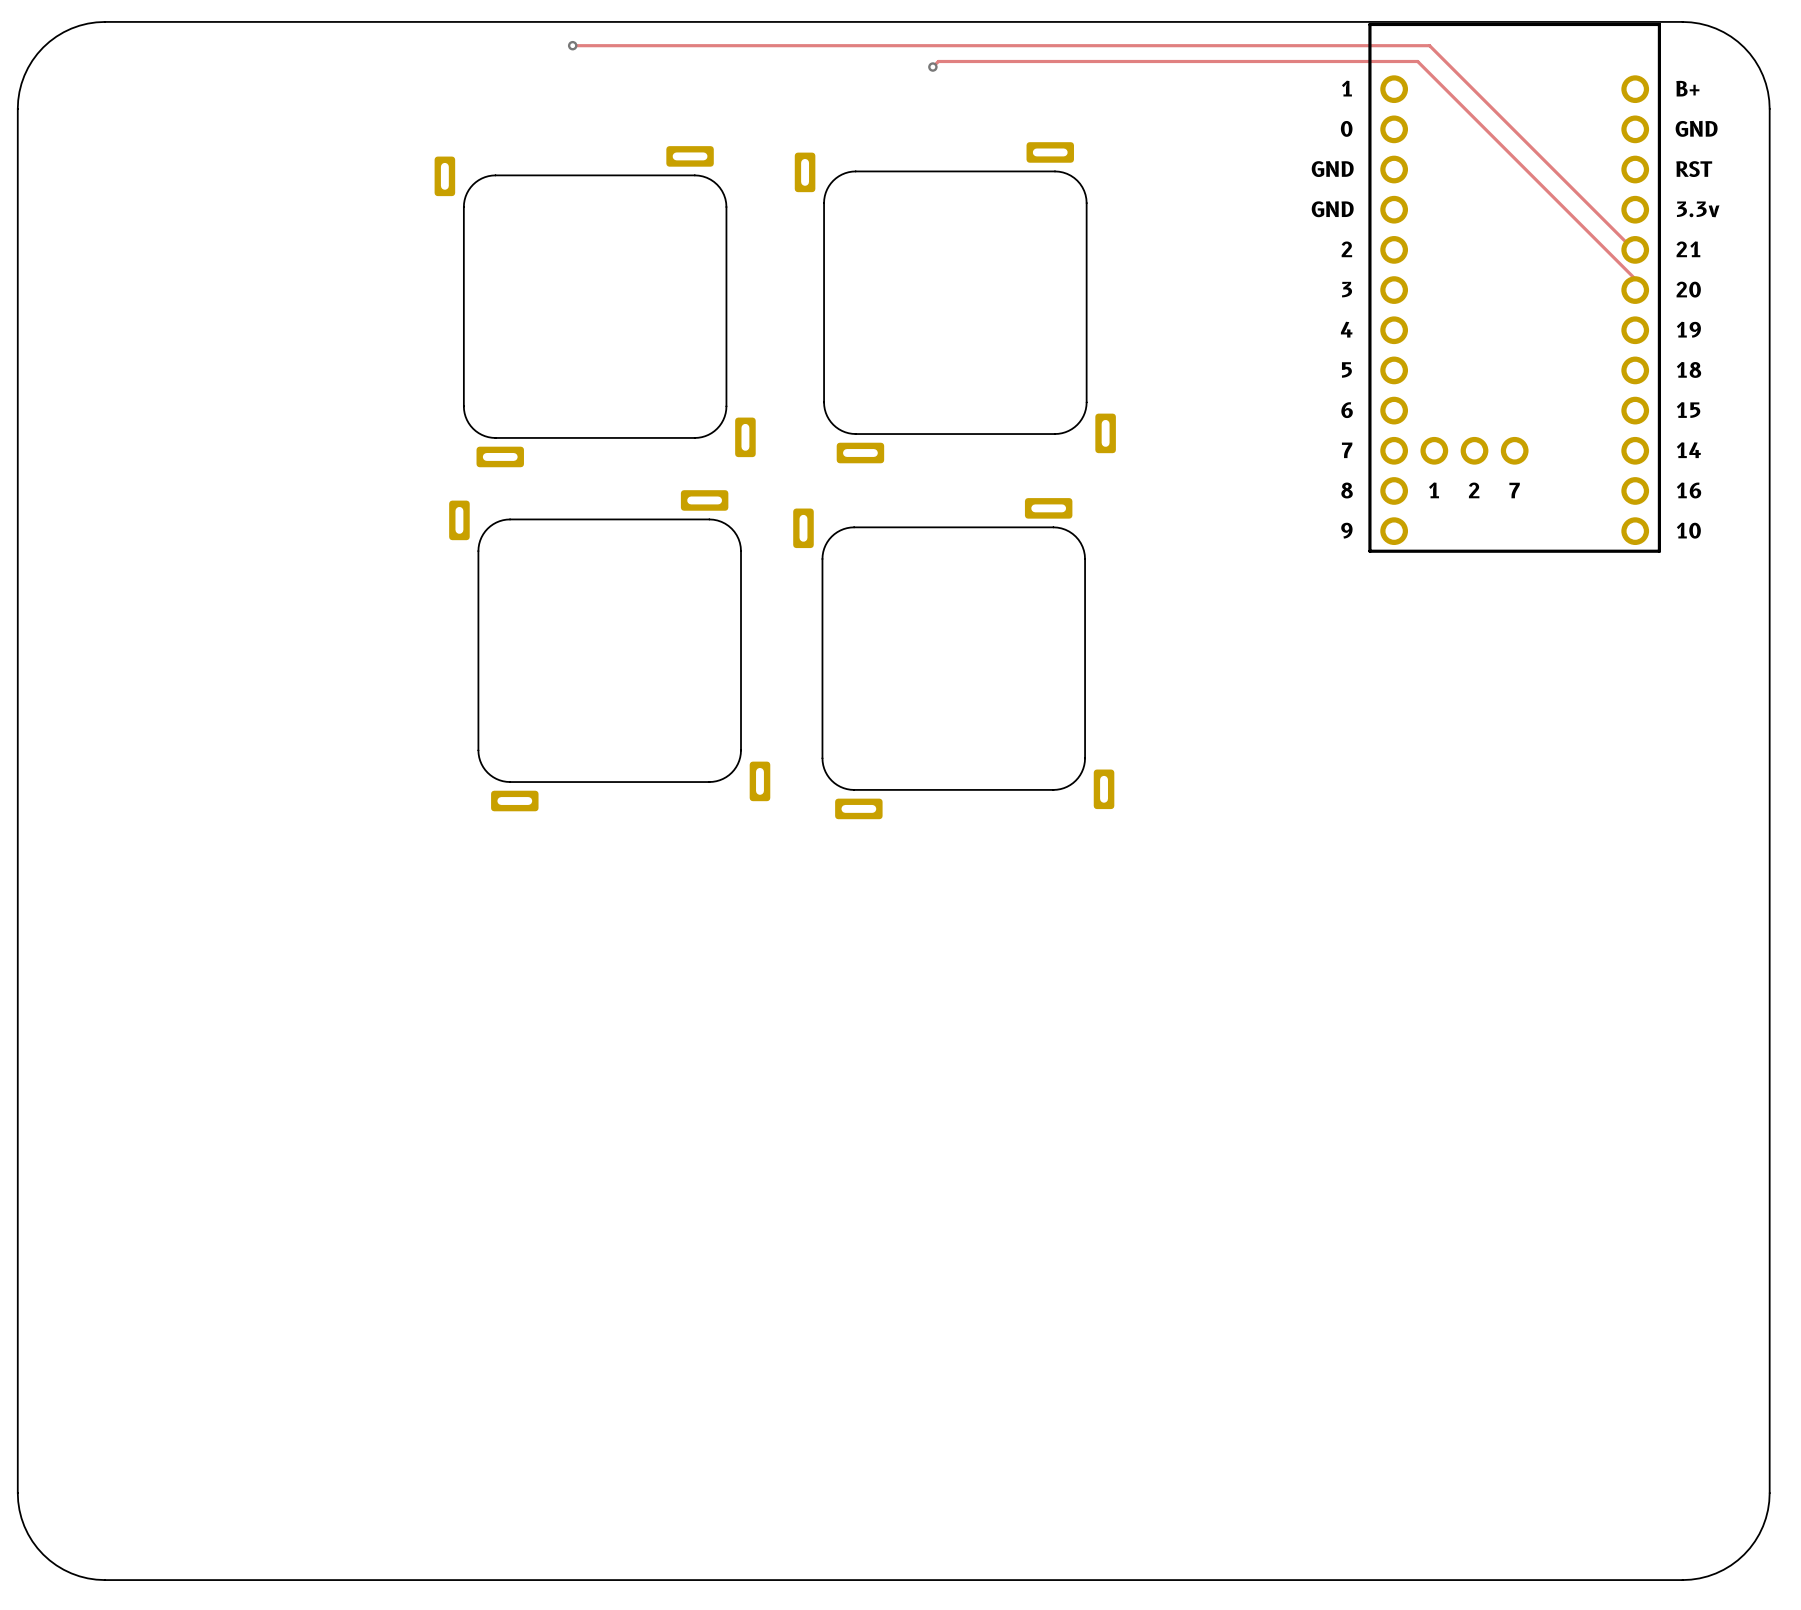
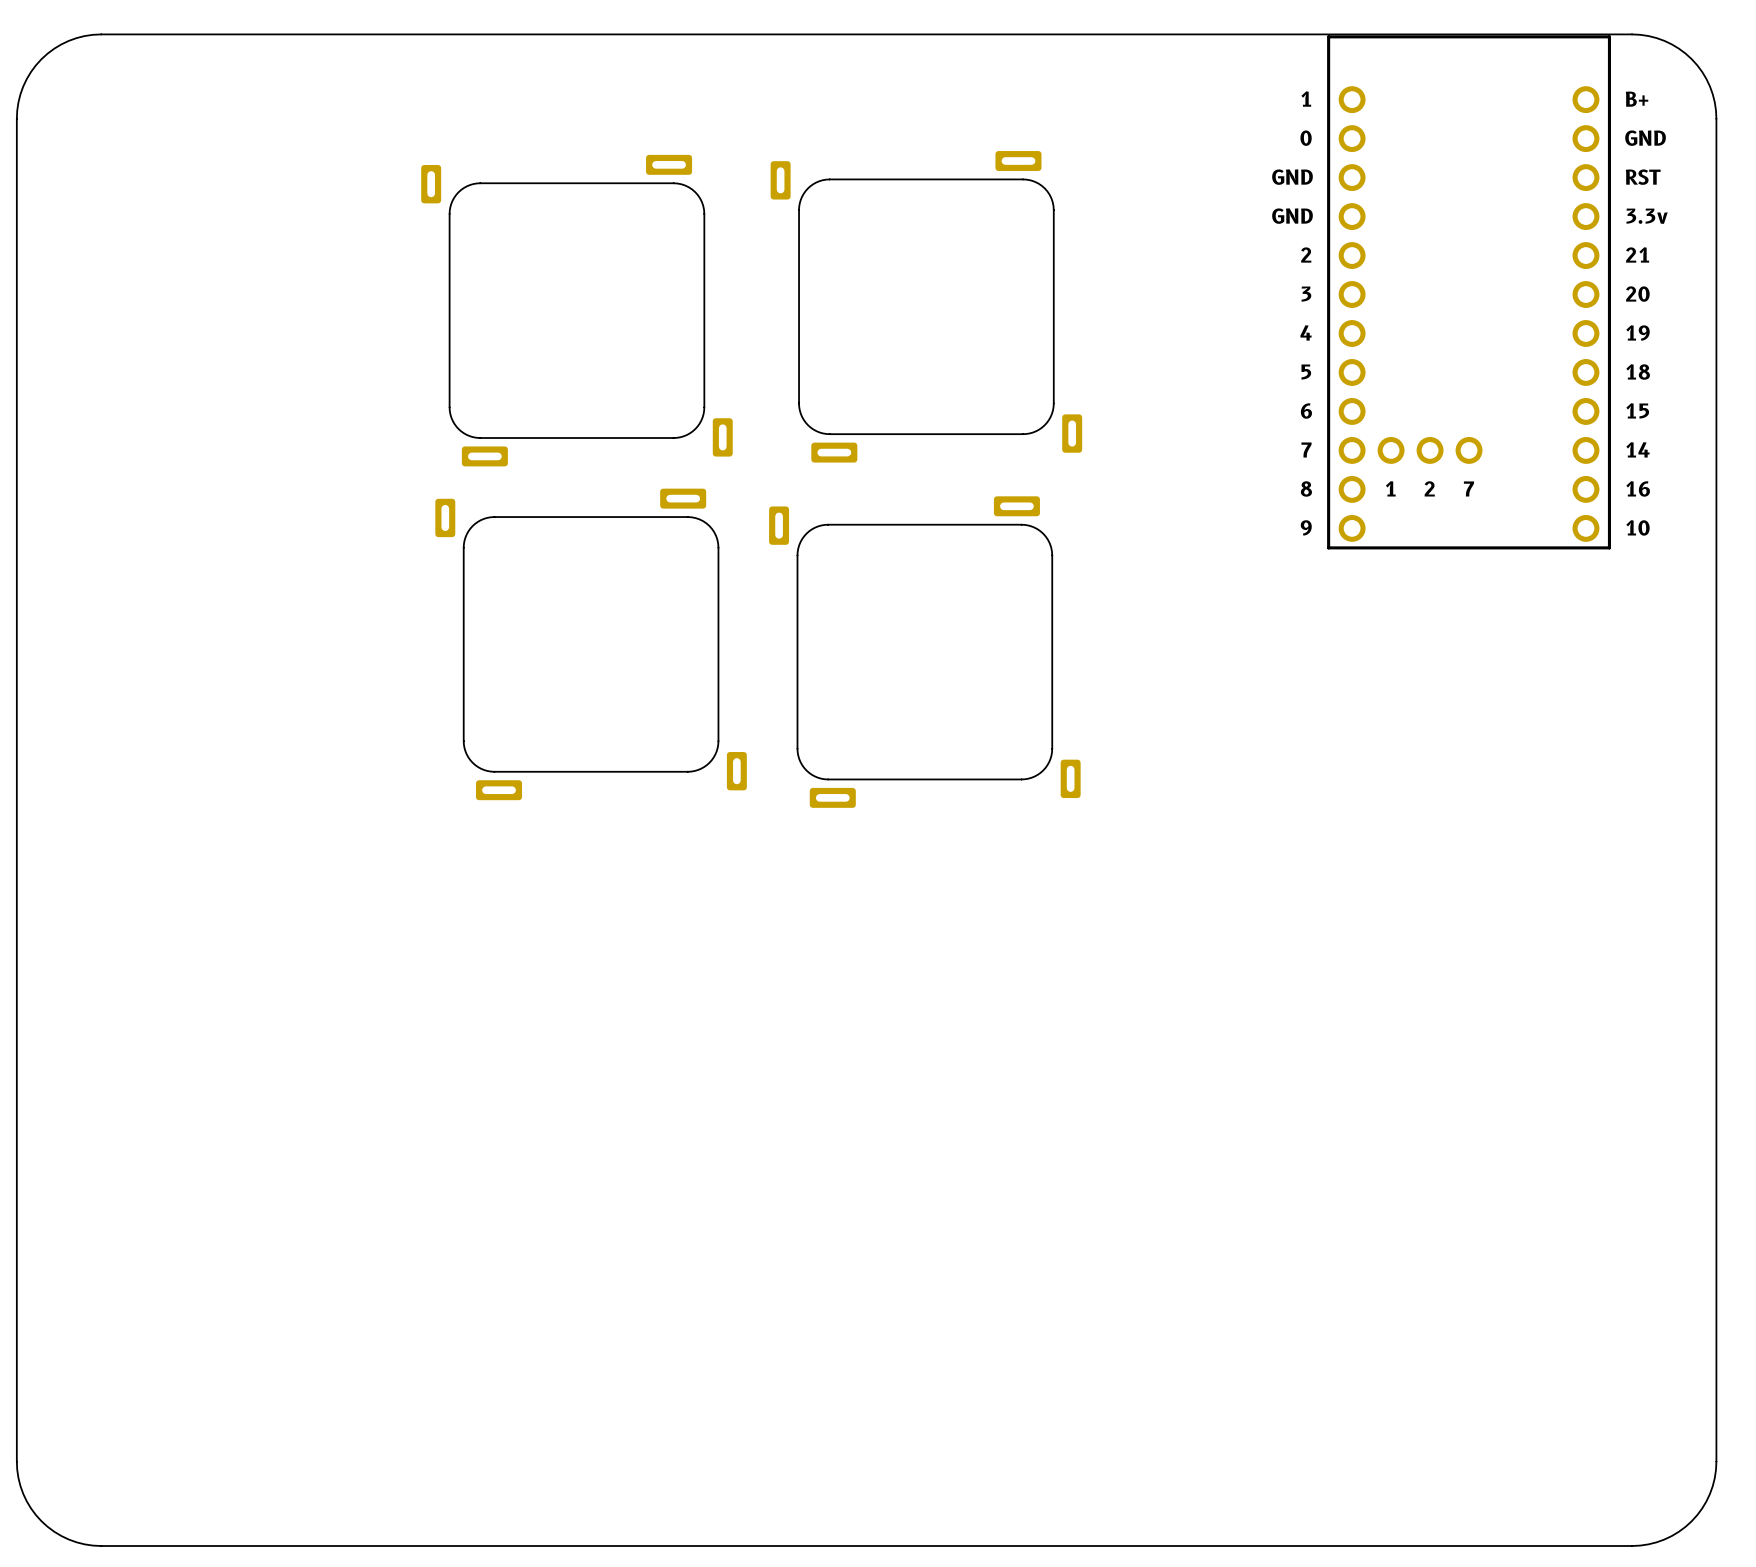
track: (572, 45) (1429, 45) (1635, 249) -> none
via: (572, 45) -> none
track: (932, 67) (938, 61) (1417, 61) (1635, 279) (1635, 290) -> none
via: (932, 67) -> none

